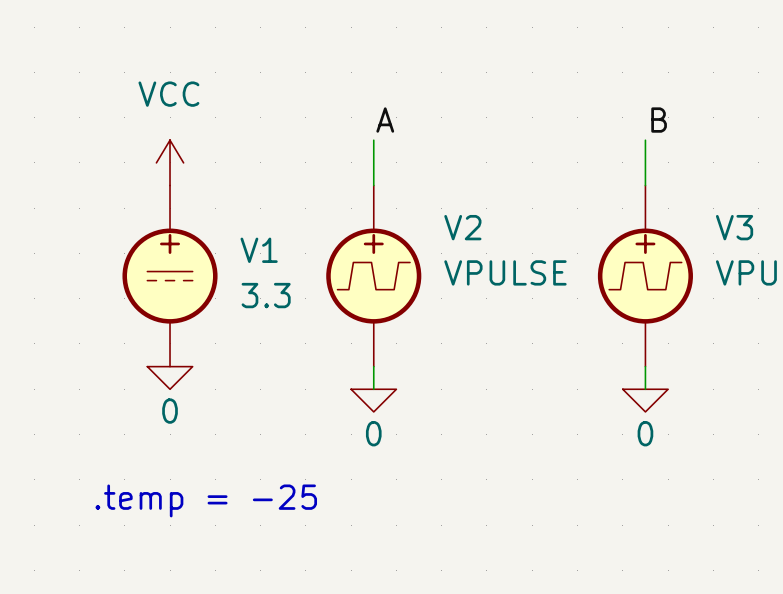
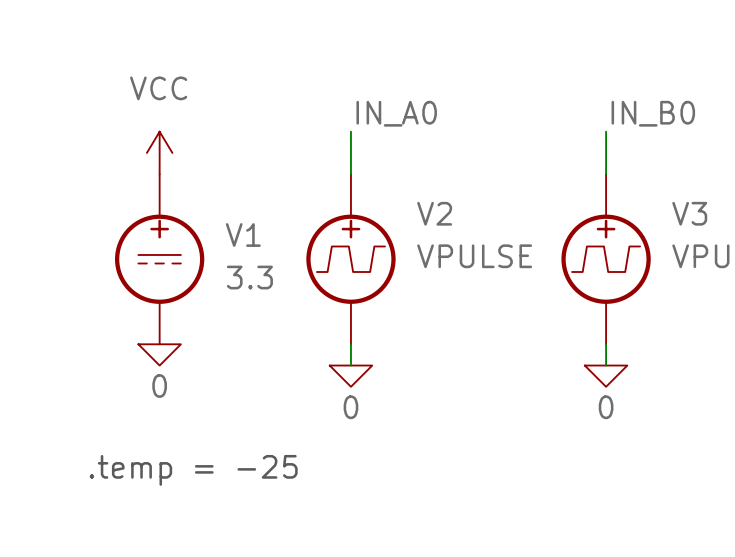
label: A (385, 120) -> IN_A0 (396, 113)
label: B (659, 120) -> IN_B0 (653, 113)

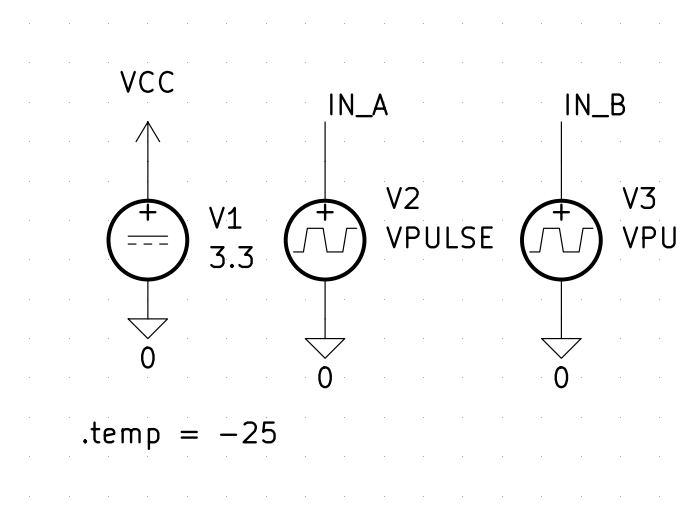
label: IN_A0 (396, 113) -> IN_A (358, 105)
label: IN_B0 (653, 113) -> IN_B (595, 105)

